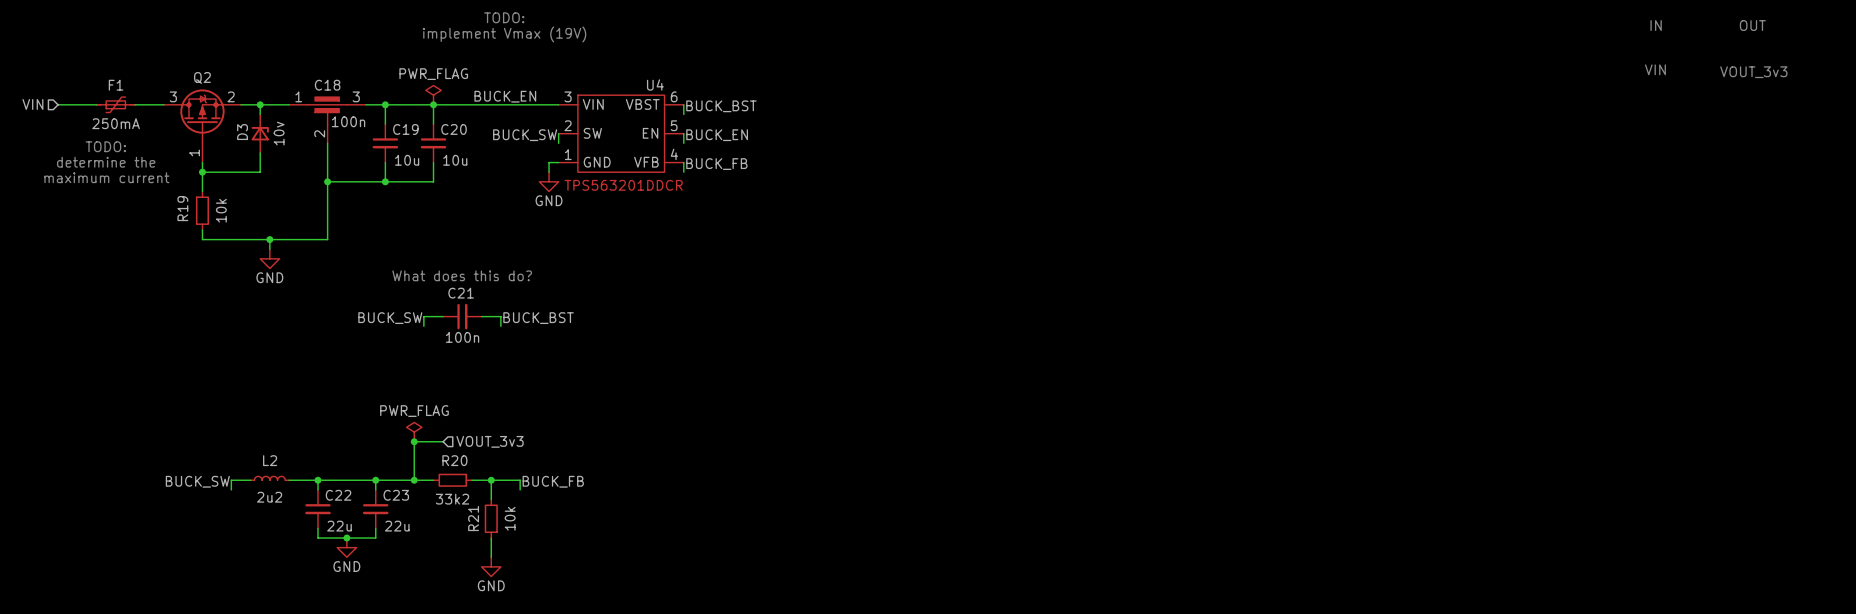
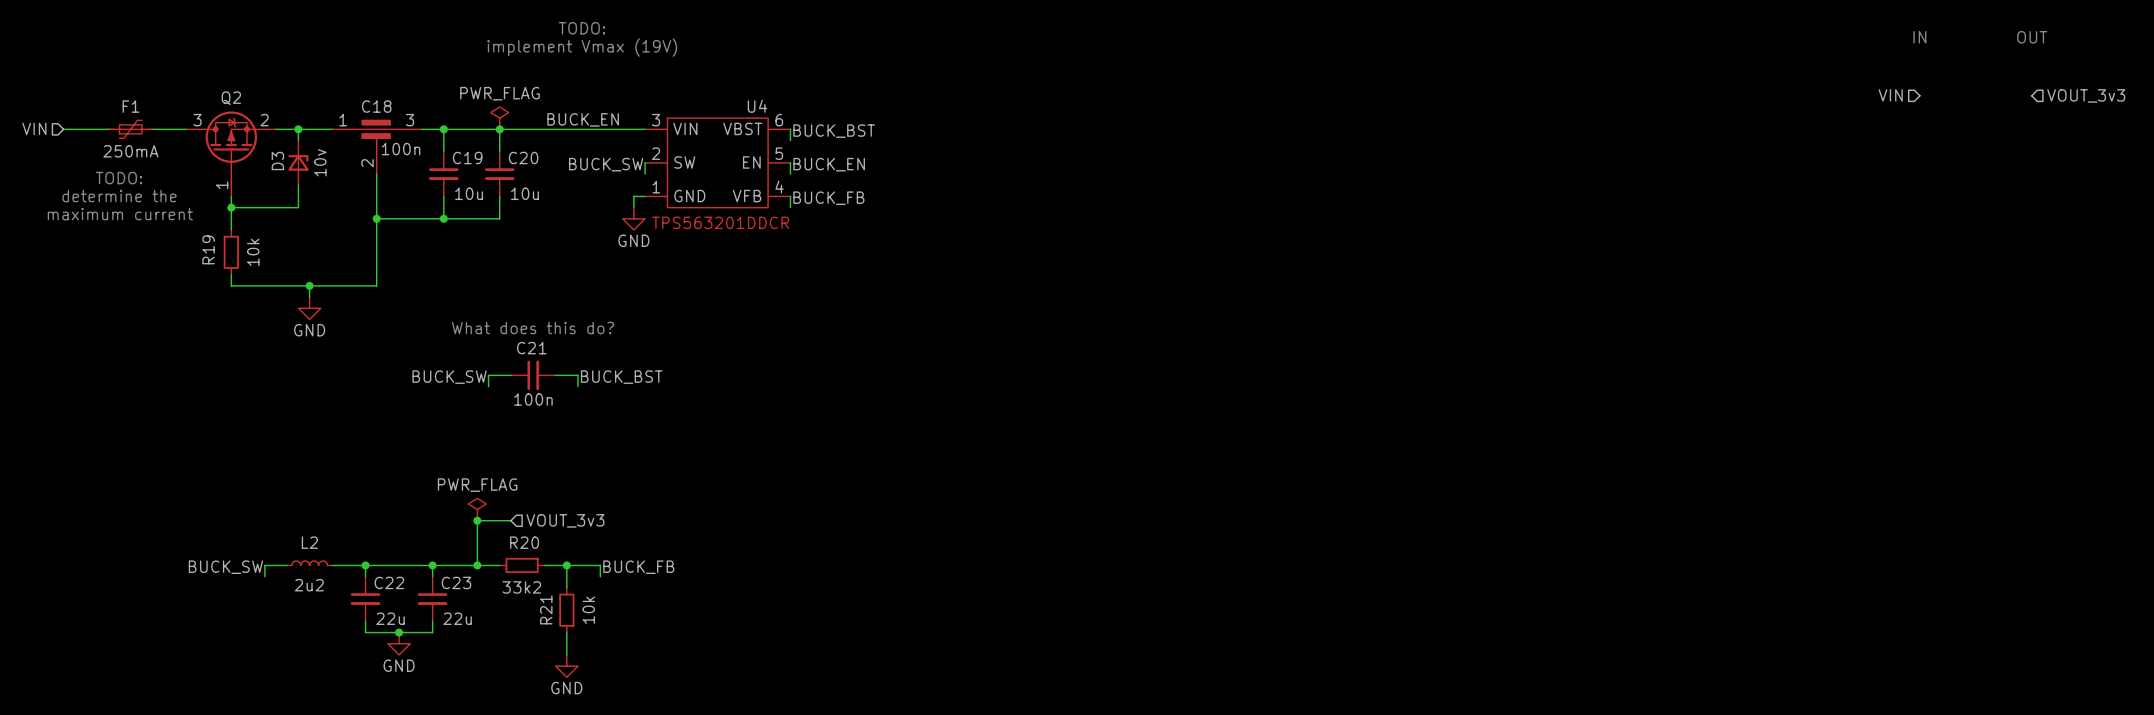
text: VIN (1655, 69) -> none
text: VOUT_3v3 (1753, 72) -> none
hierarchical label: none -> VIN (1890, 95)
hierarchical label: none -> VOUT_3v3 (2086, 95)

